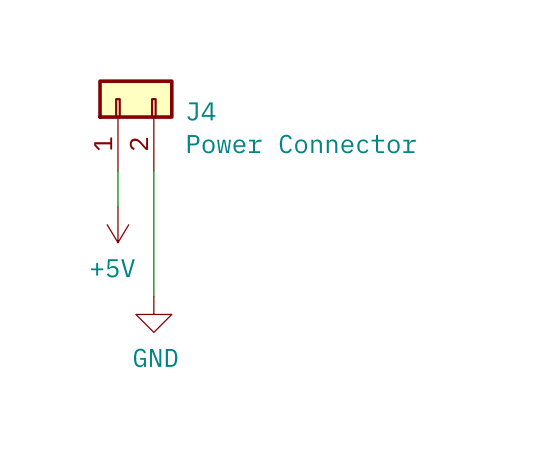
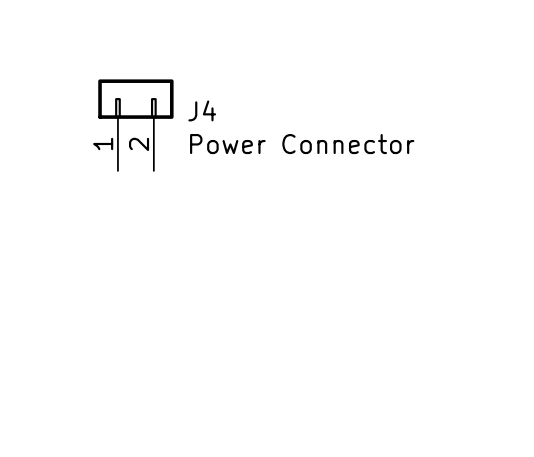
wire: (117, 170) (117, 206) -> none
wire: (153, 170) (153, 296) -> none
power symbol: +5V (117, 224) -> none
power symbol: GND (153, 314) -> none

